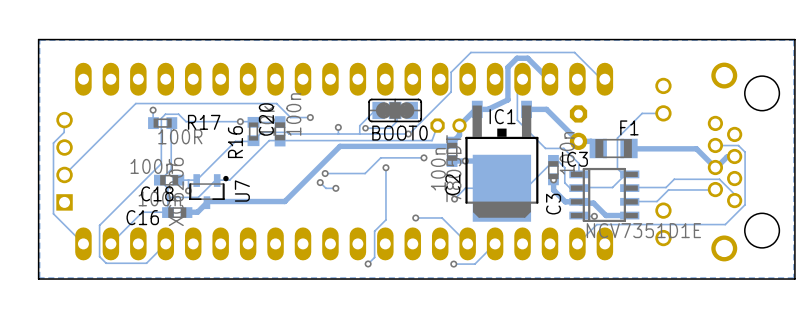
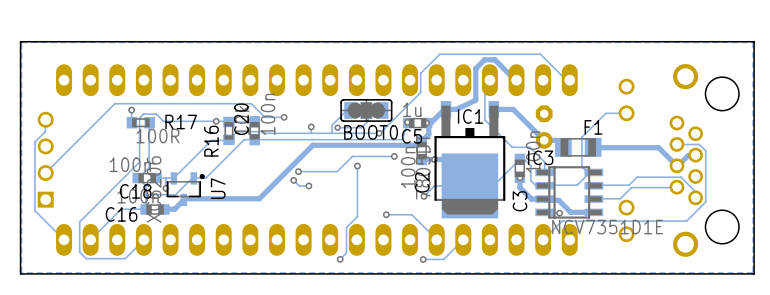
via: none -> (407, 122)
C5: none -> 1u (417, 123)
via: none -> (426, 123)
part: (448, 125) -> none

